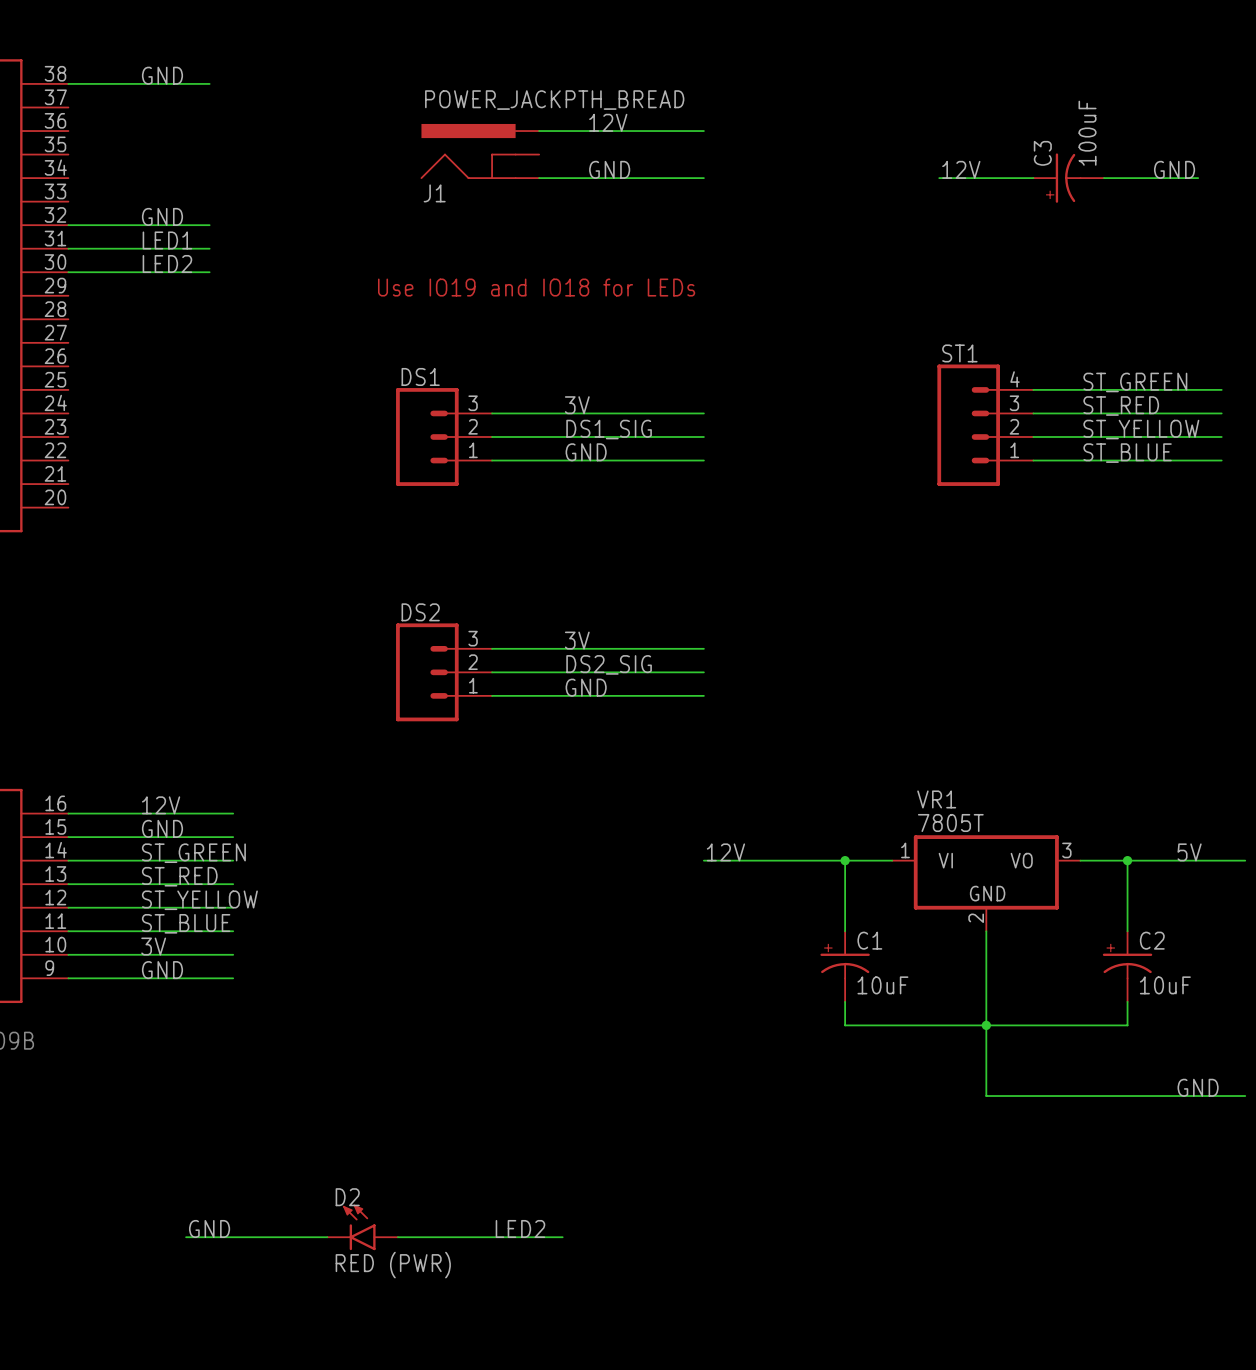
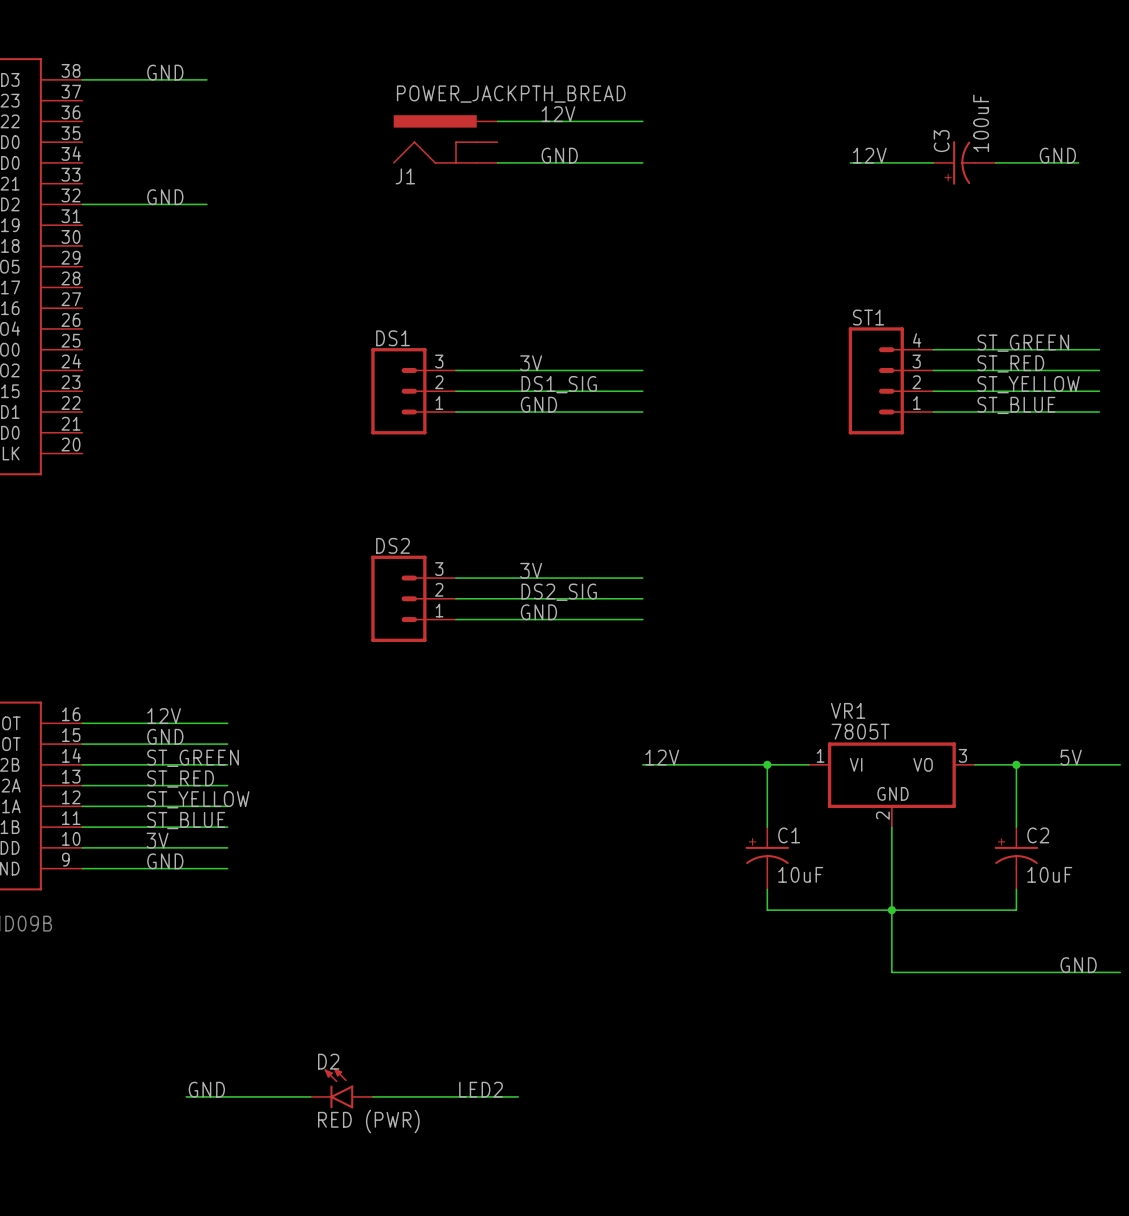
label: LED1 (167, 240) -> none
wire: (68, 248) (209, 248) -> none
label: LED2 (167, 264) -> none
wire: (68, 272) (209, 272) -> none
text: Use IO19 and IO18 for LEDs (536, 287) -> none

